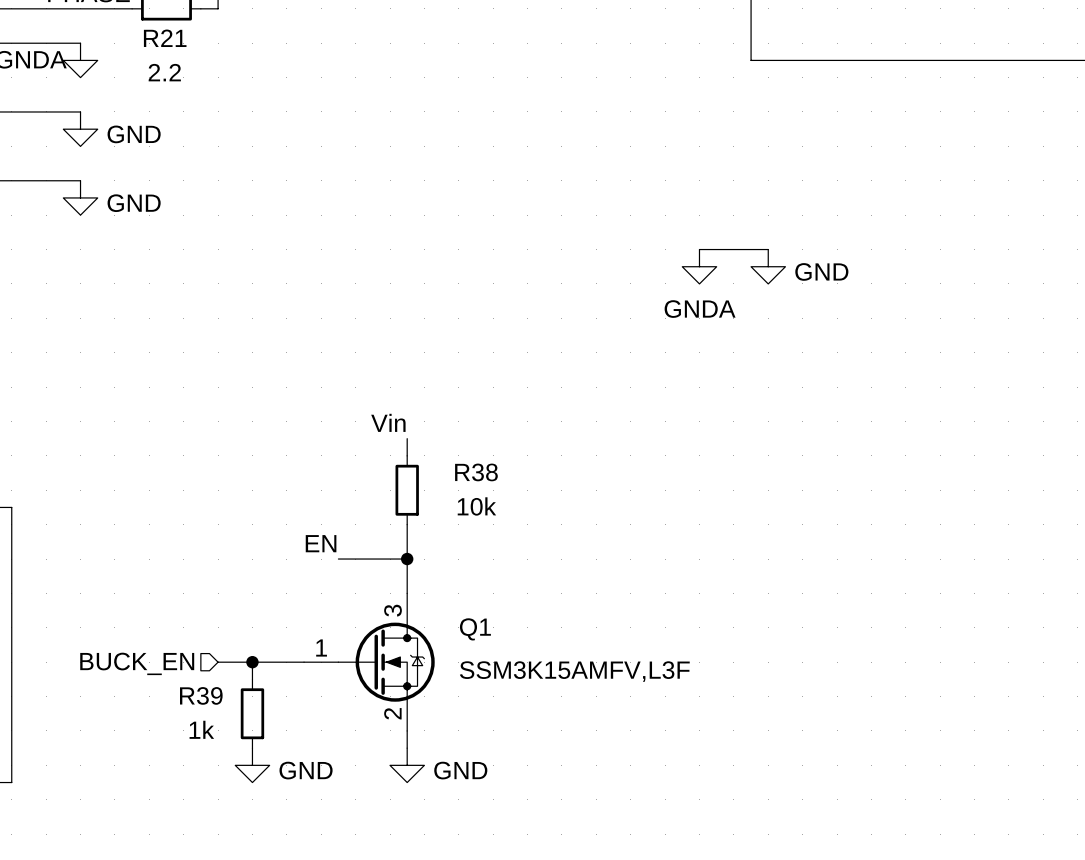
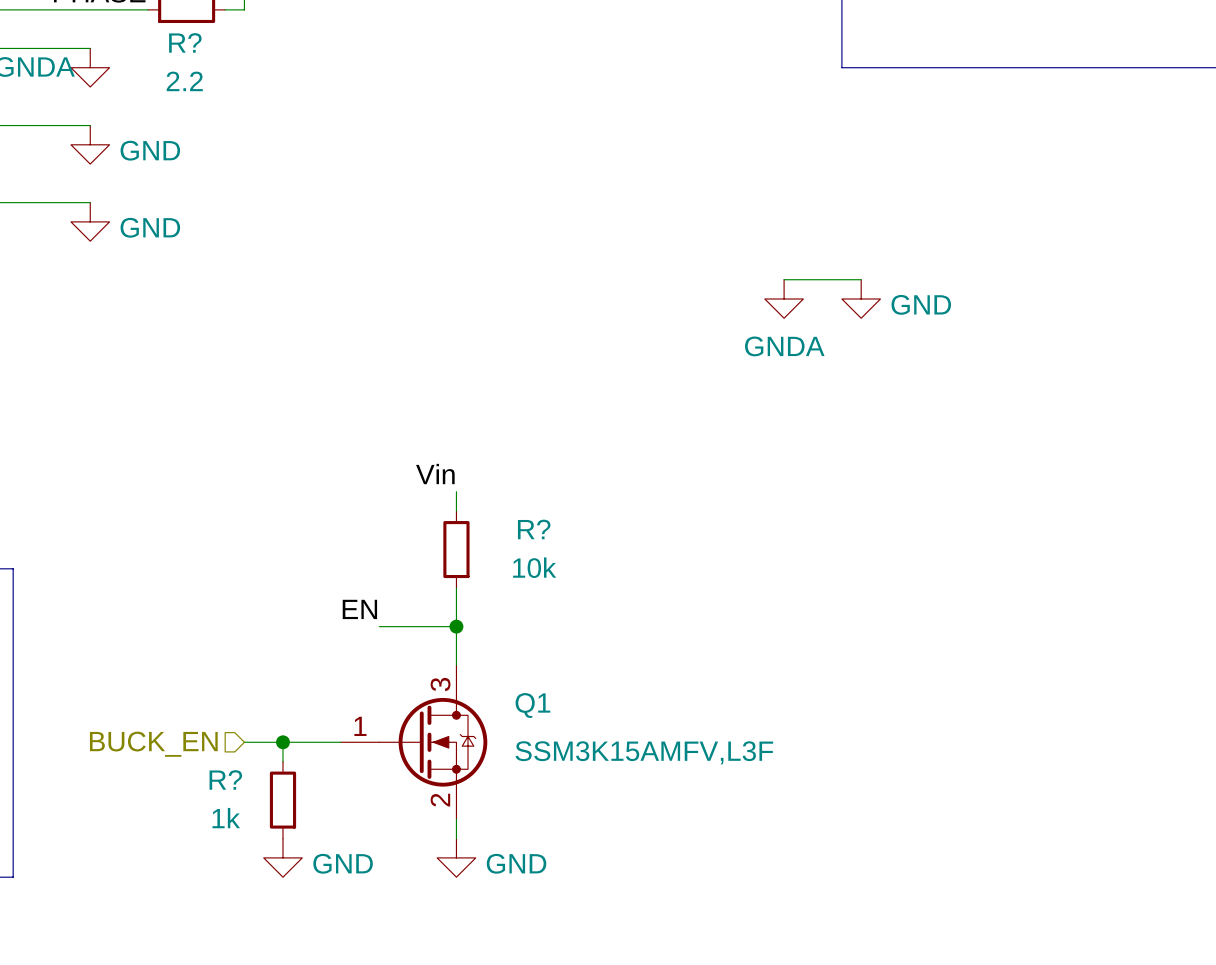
R21 name: R21 (165, 38) -> R? (185, 42)
R38 name: R38 (476, 472) -> R? (534, 529)
R39 name: R39 (201, 695) -> R? (225, 779)

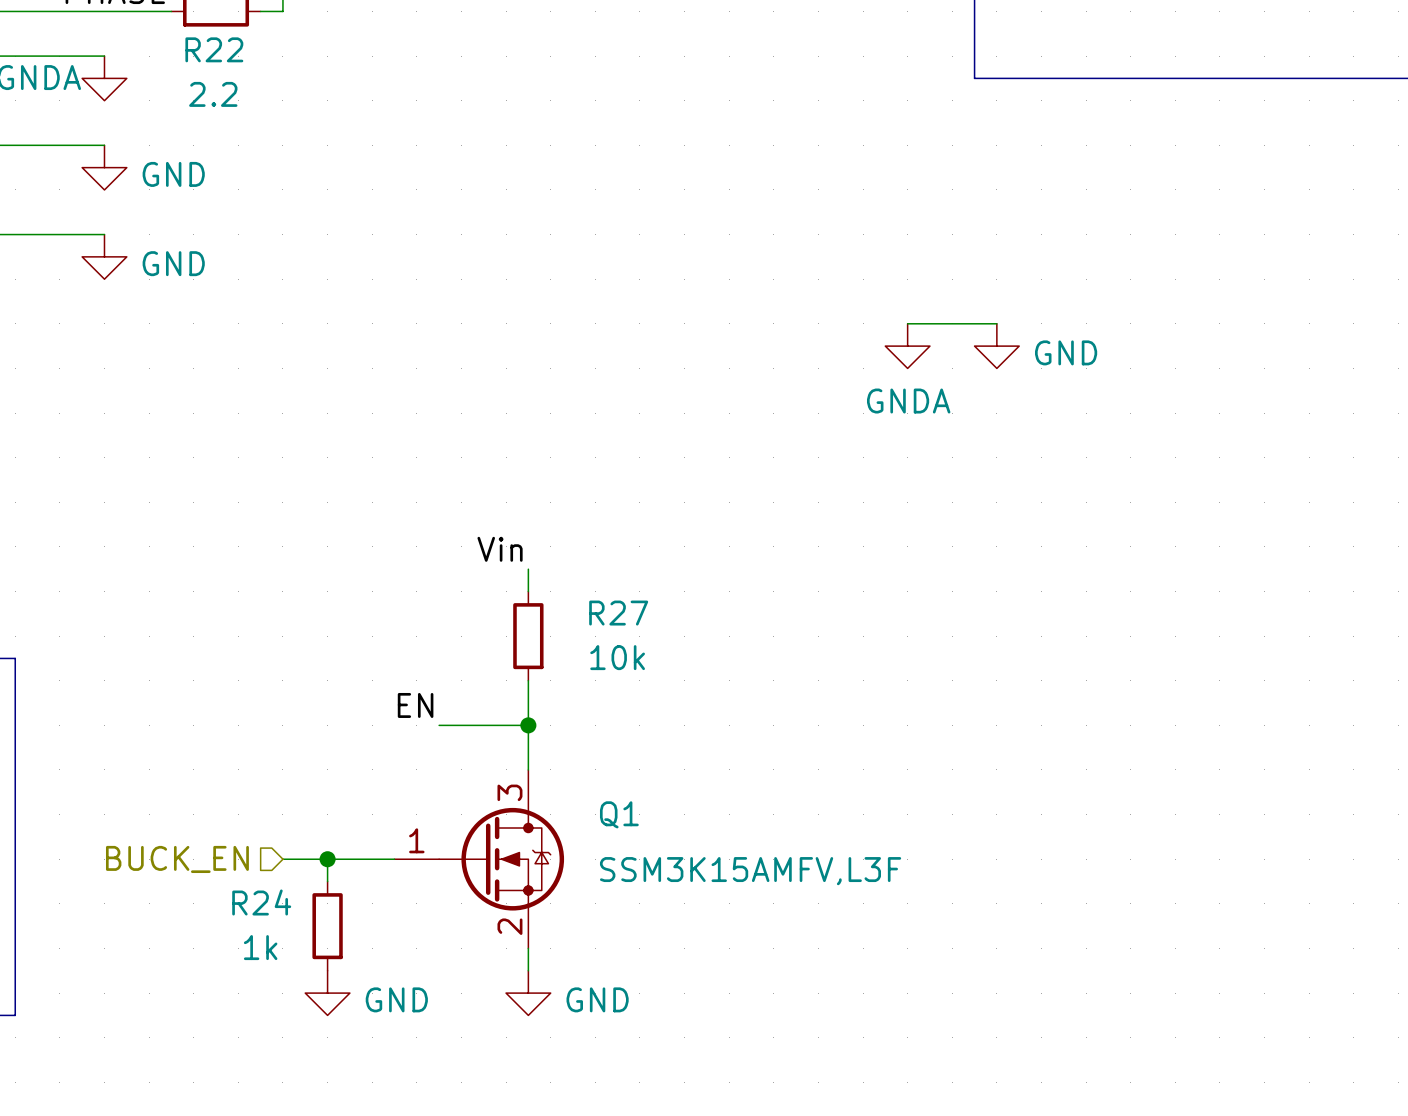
R? name: R? (185, 42) -> R22 (214, 49)
R? name: R? (534, 529) -> R27 (618, 613)
R? name: R? (225, 779) -> R24 (261, 902)

